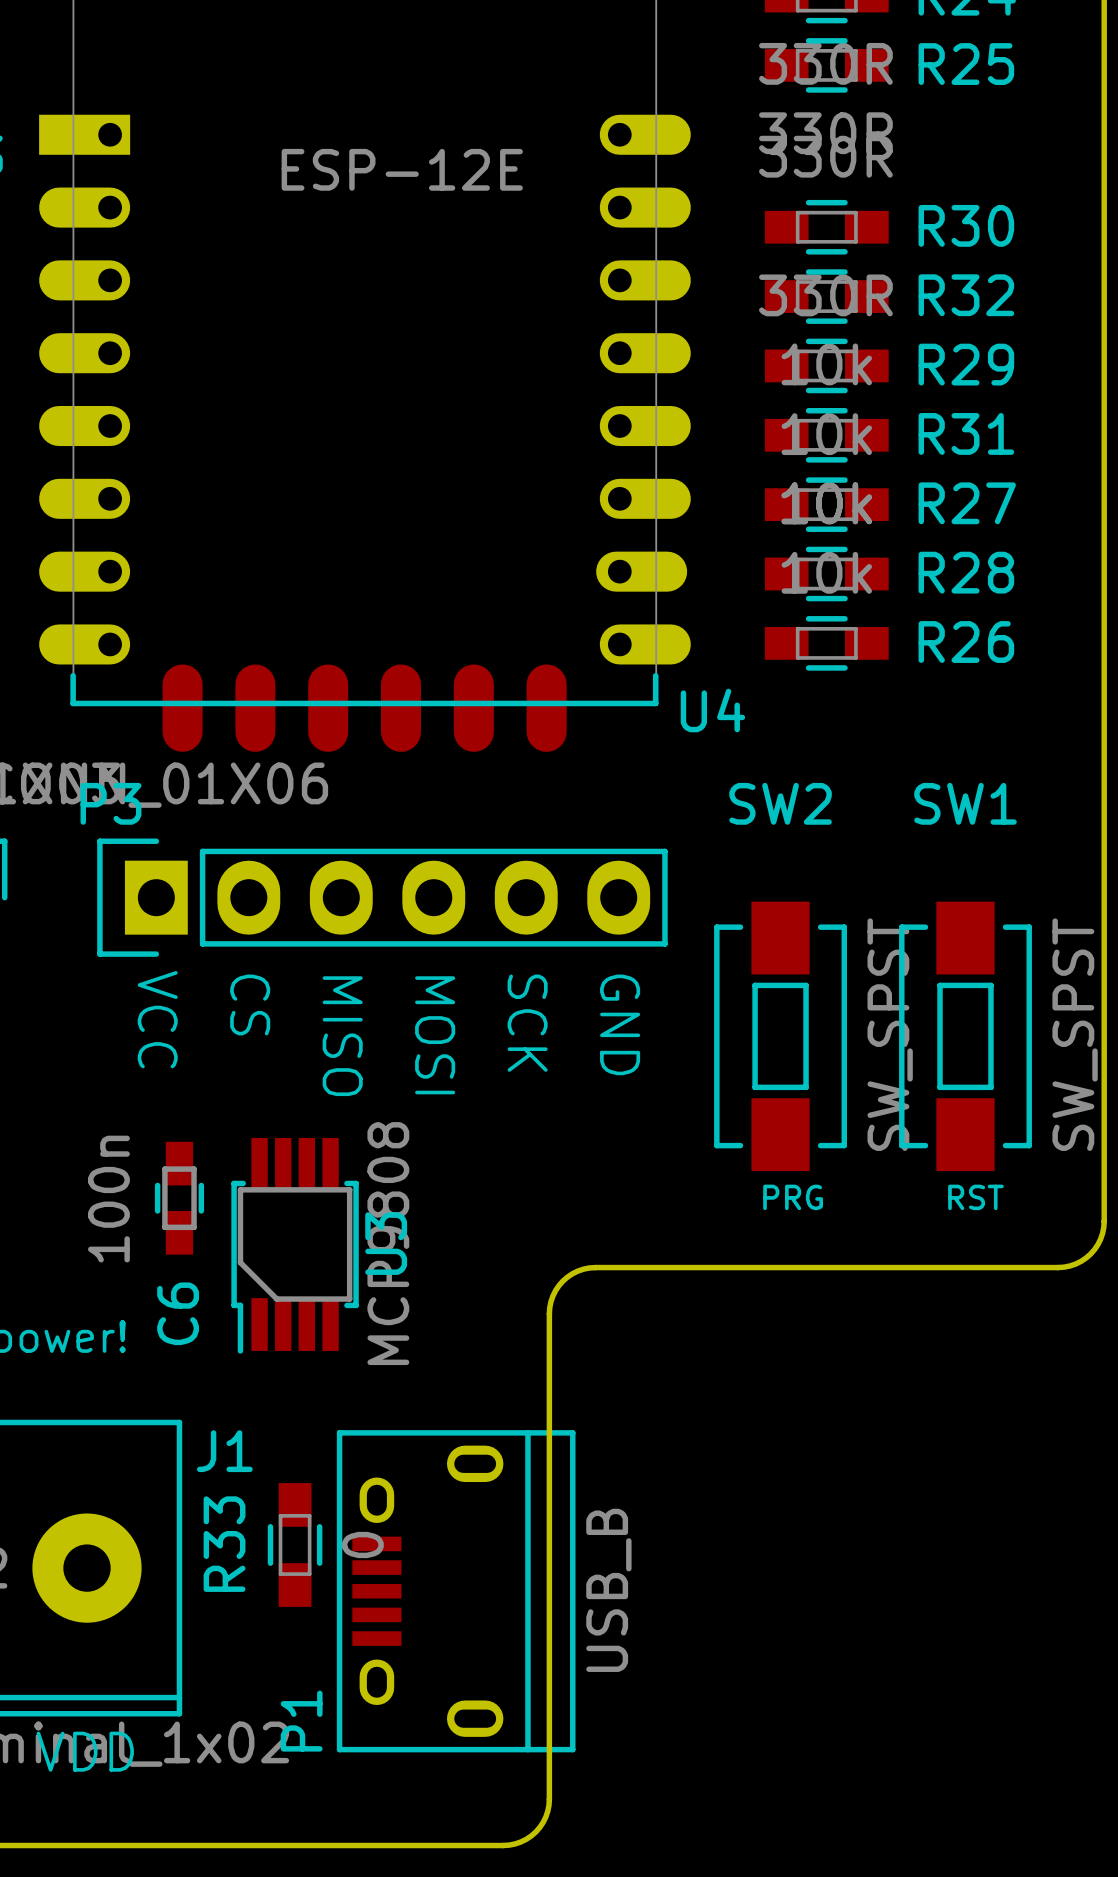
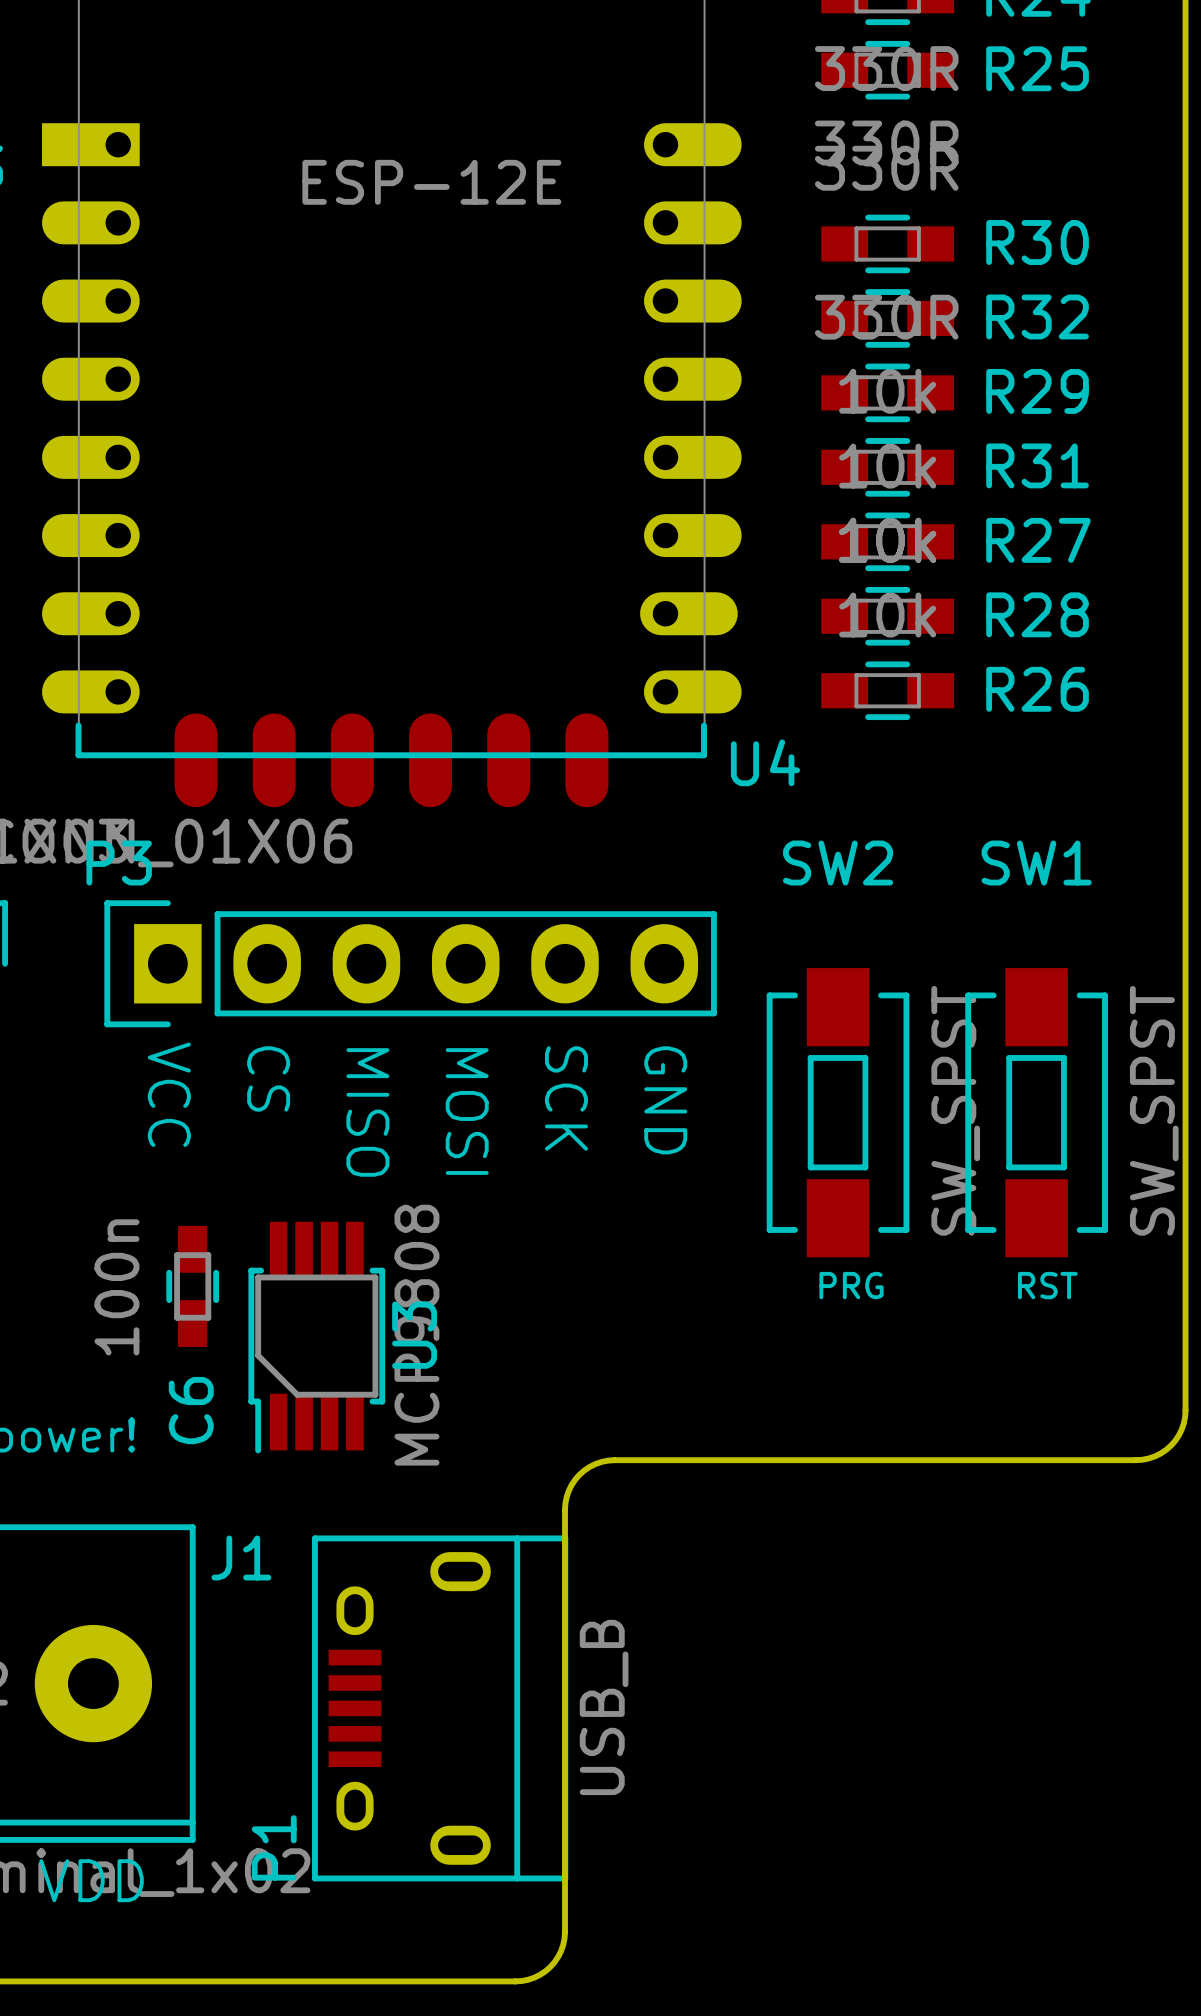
board edge: (1104, 1221) (1100, 1239) (1090, 1254) (1081, 1261) (1064, 1267) (595, 1267) -> (1185, 1311) (1183, 1423) (1178, 1435) (1166, 1449) (1148, 1458) (1135, 1460)
board edge: (595, 1267) (583, 1269) (567, 1277) (555, 1290) (549, 1307) (549, 1799) (547, 1811) (539, 1827) (526, 1839) (509, 1845) (480, 1845) -> (1135, 1460) (614, 1460) (601, 1461) (584, 1470) (575, 1479) (568, 1490) (565, 1509) (564, 1938) (558, 1956) (545, 1971) (528, 1979) (515, 1981)
R33: 0 (295, 1544) -> none
P1 position: (456, 1591) -> (440, 1708)

